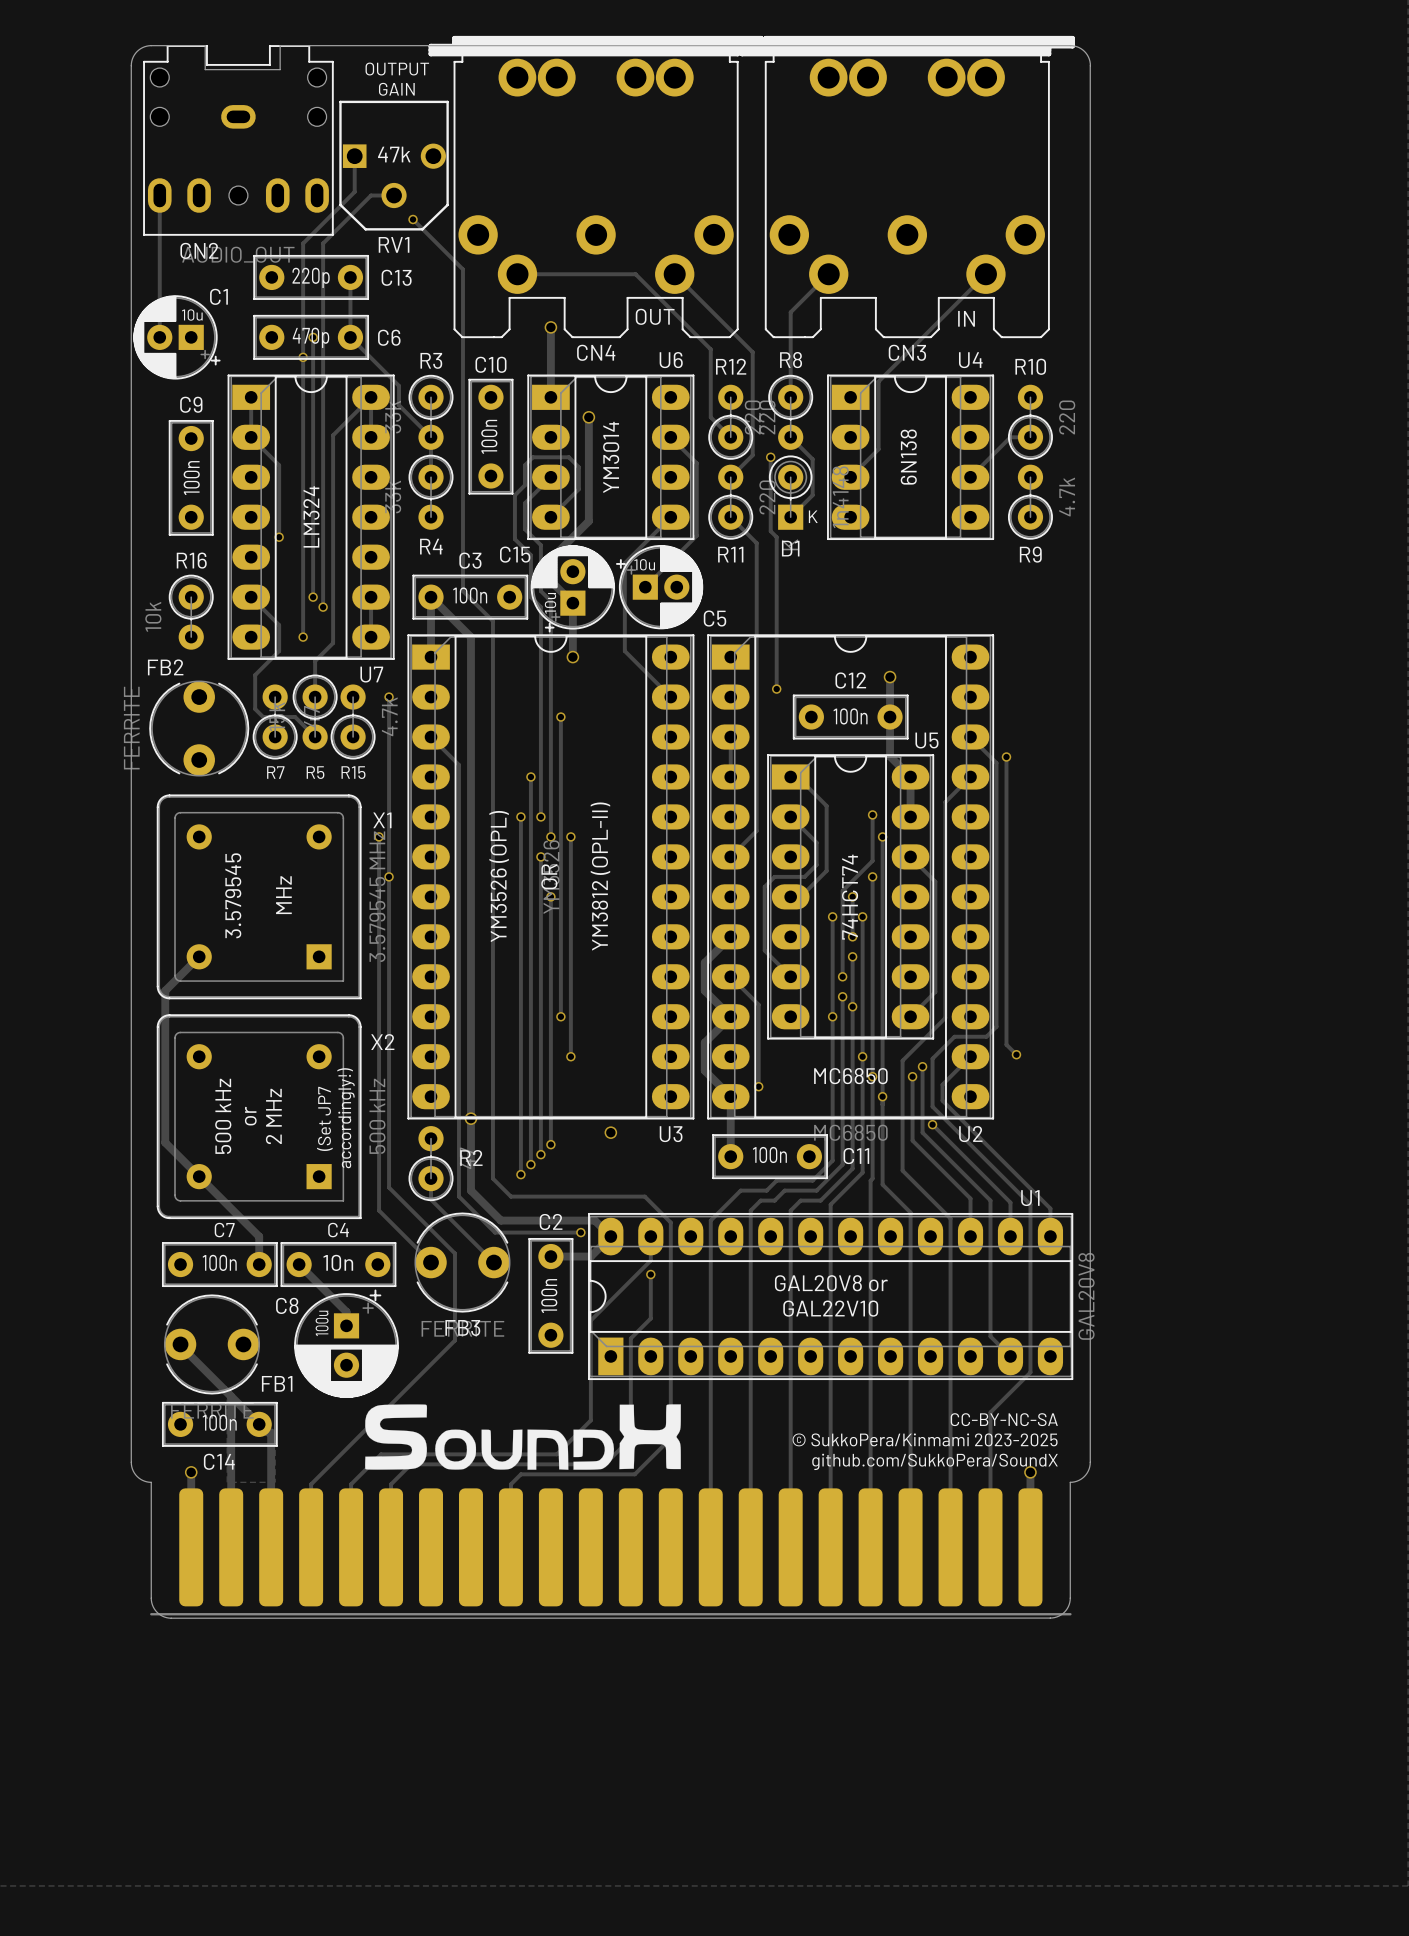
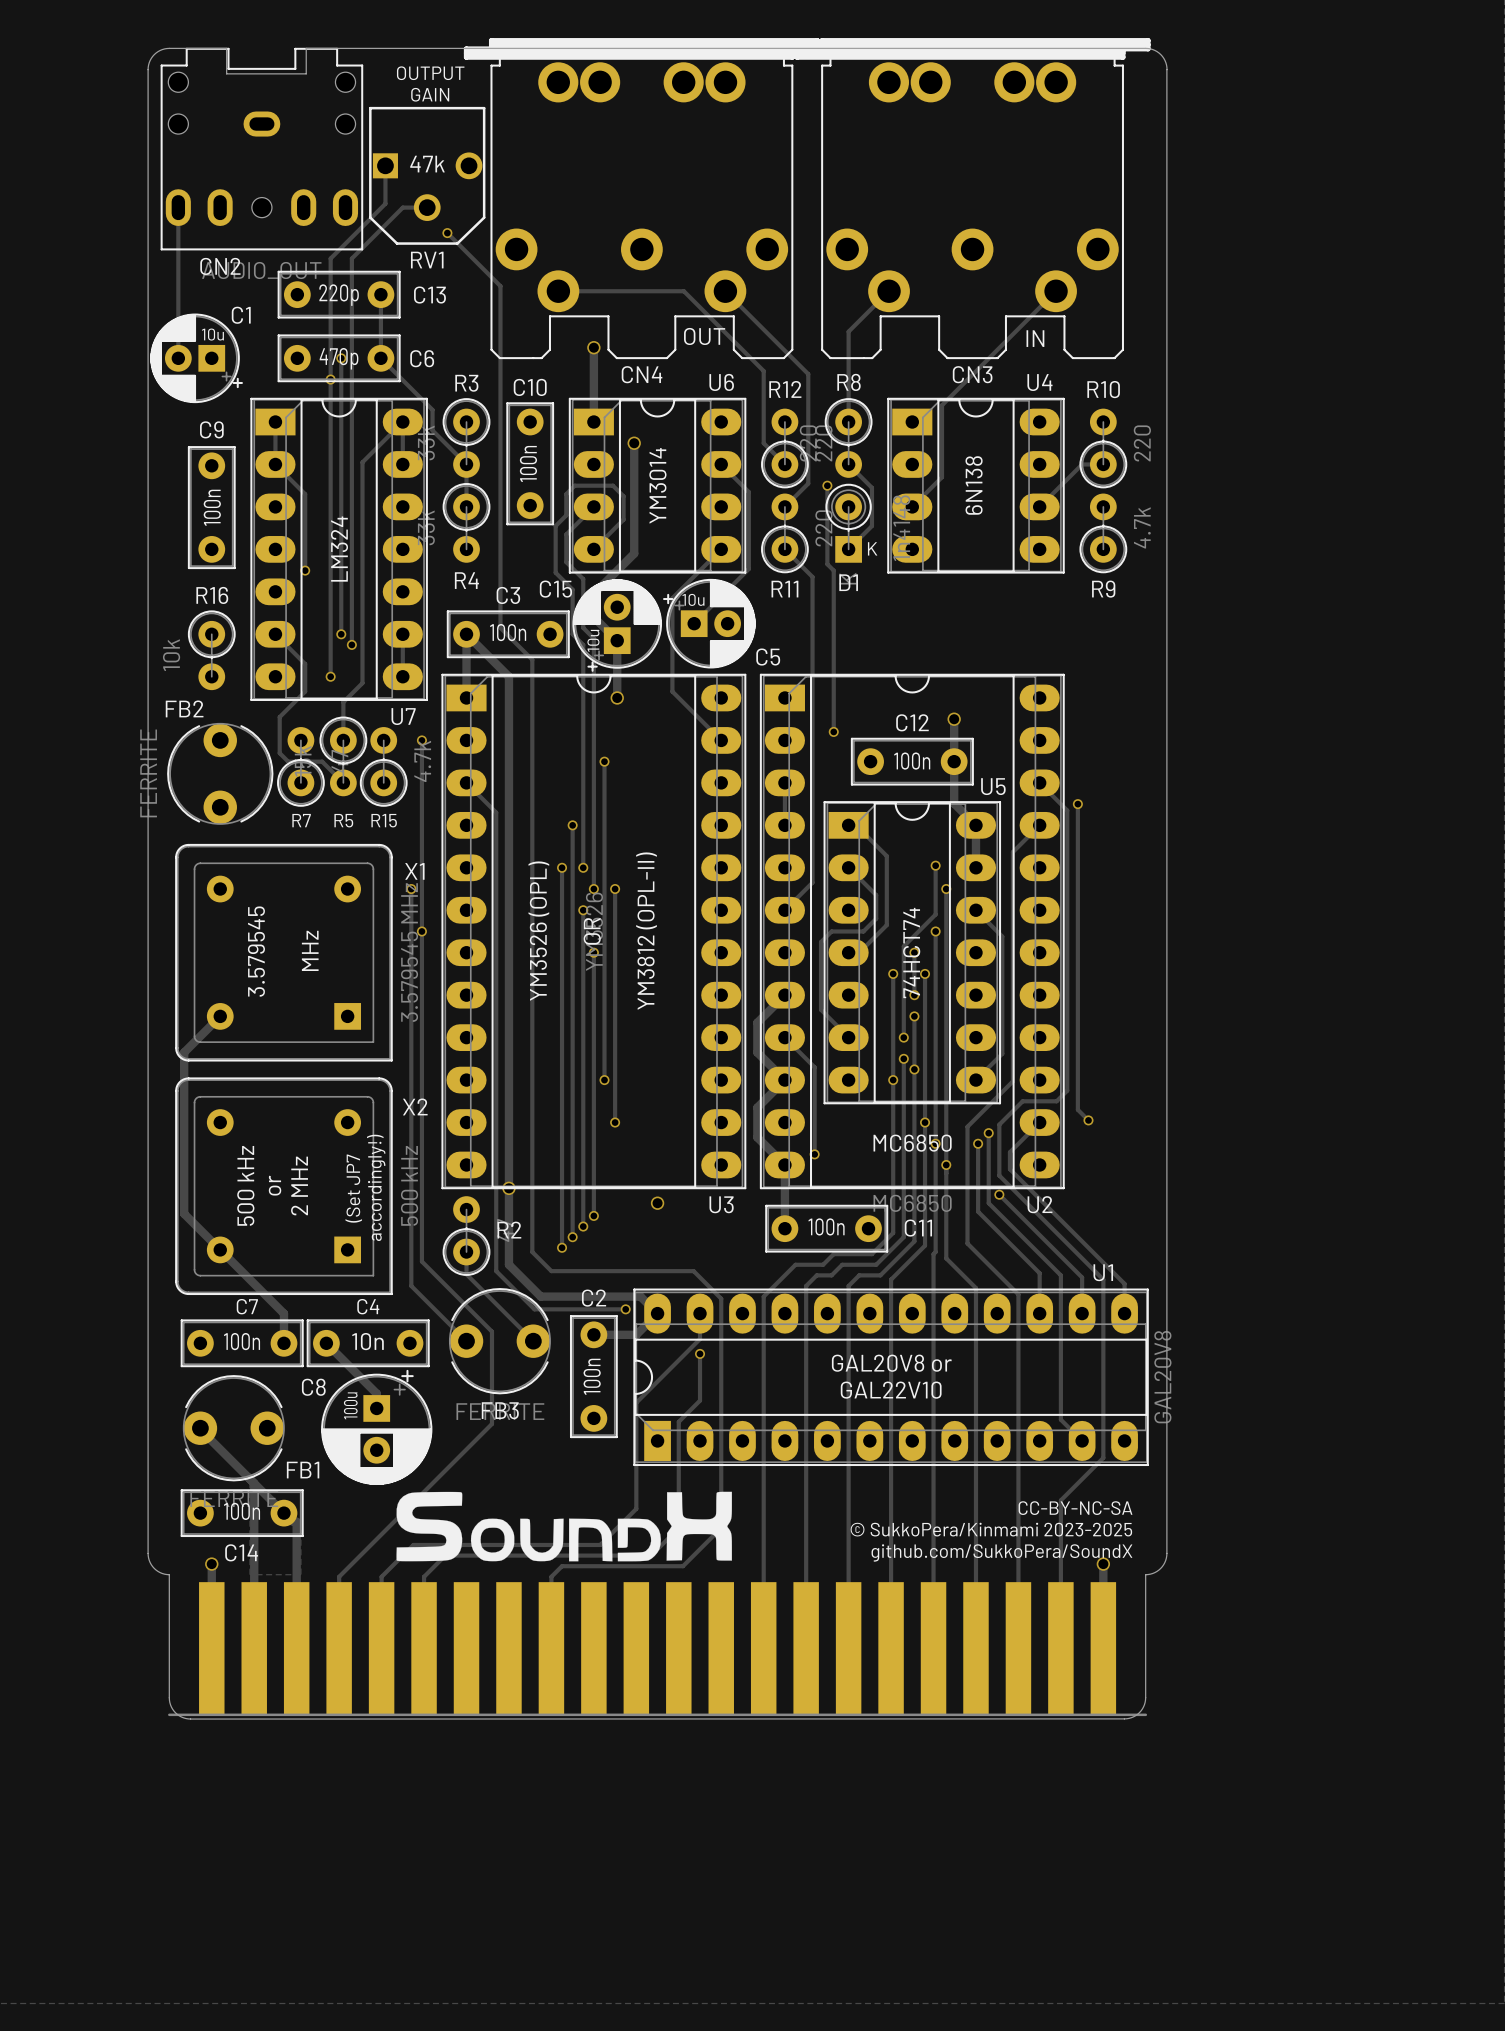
part footprint: [150, 1488, 1072, 1616] -> [168, 1582, 1148, 1717]

